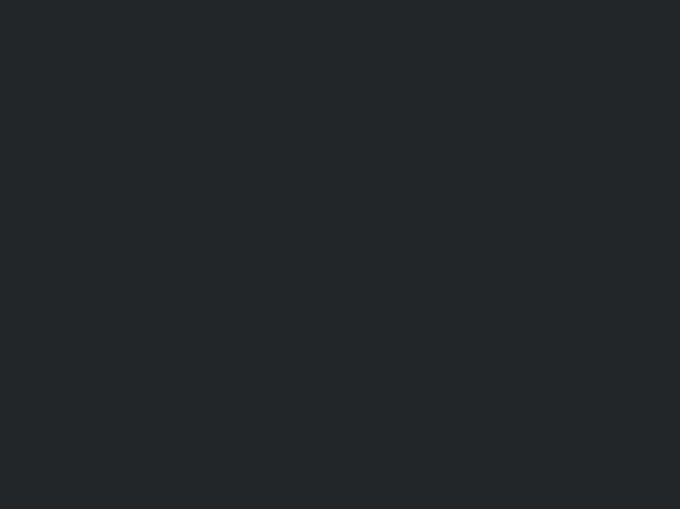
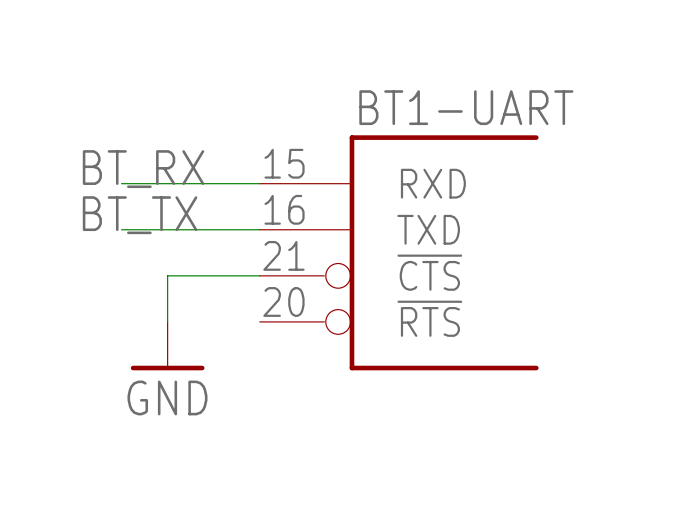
label: none -> BT_RX (143, 169)
wire: none -> (121, 183) (259, 183)
label: none -> BT_TX (140, 215)
wire: none -> (121, 229) (259, 229)
BT1-UART: none -> (399, 252)
wire: none -> (259, 275) (167, 275) (167, 321)
power symbol: none -> GND (167, 346)

